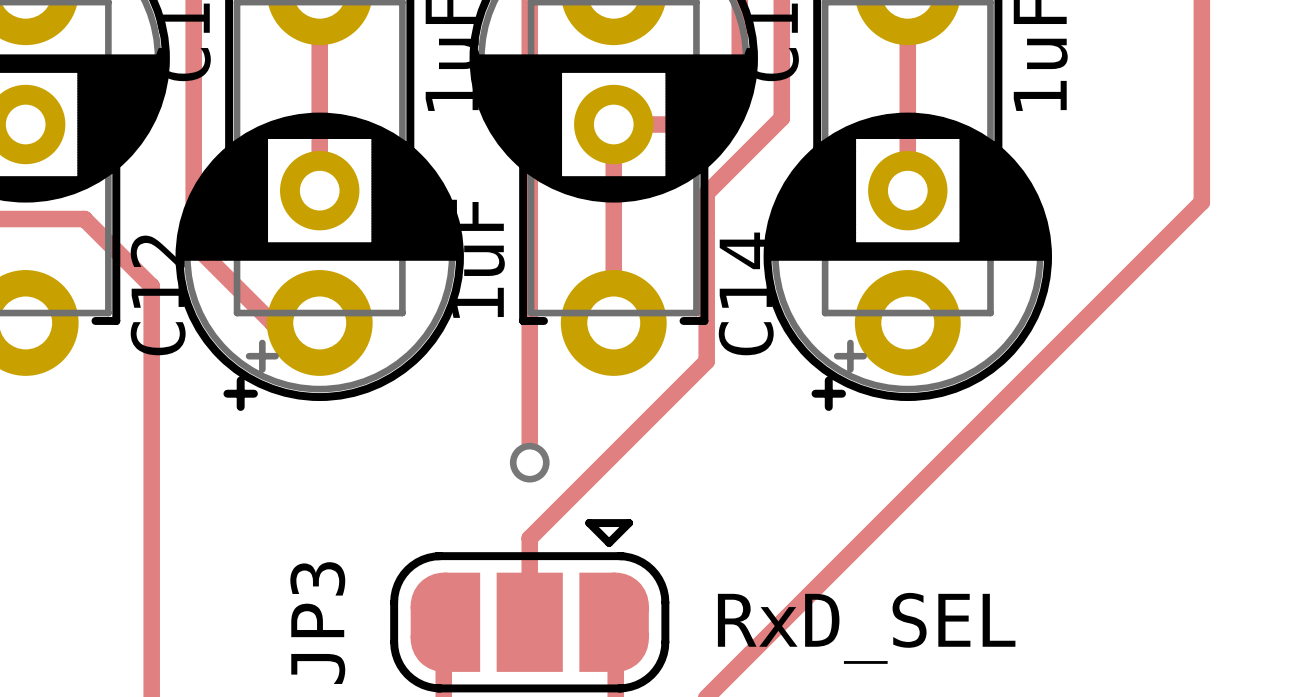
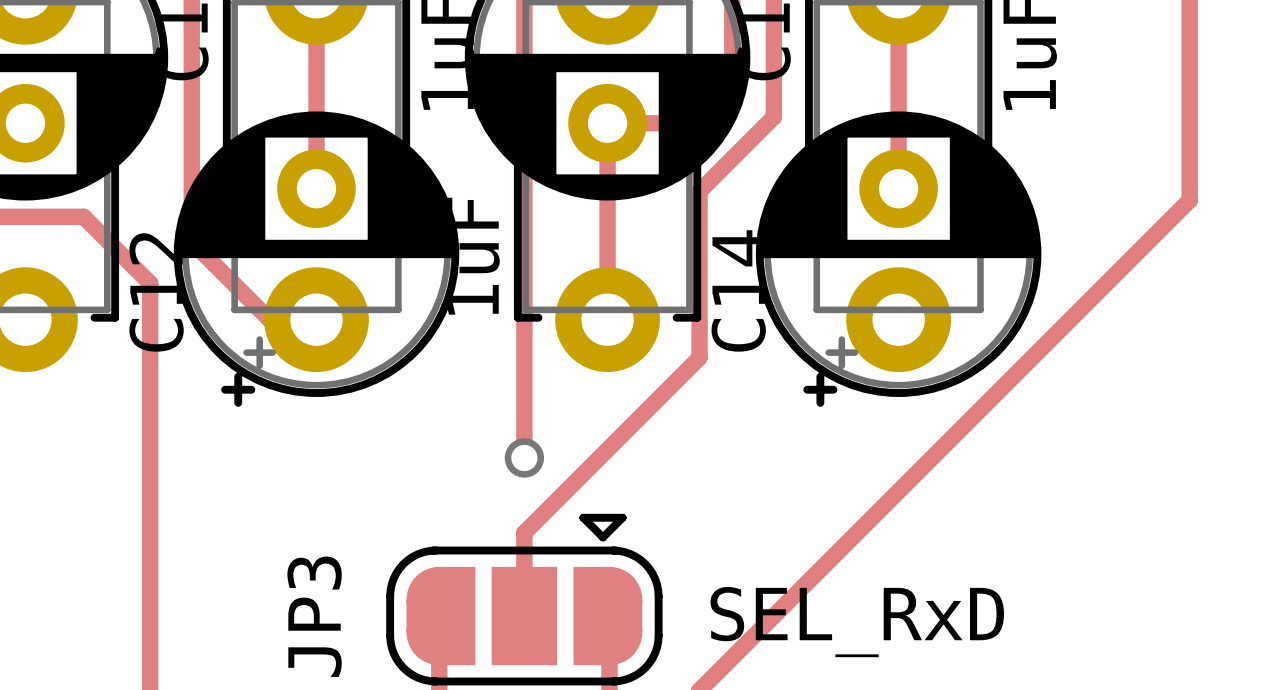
JP3 value: RxD_SEL (866, 628) -> SEL_RxD (857, 622)

